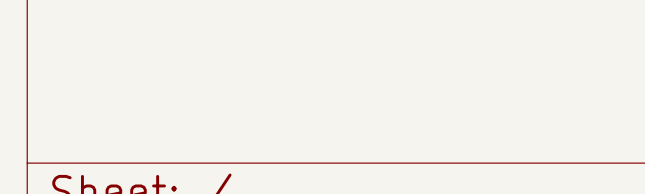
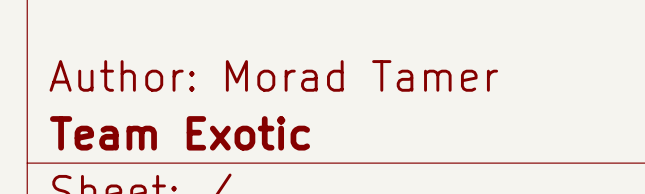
title block: none -> Author: Morad Tamer (273, 75)
title block: none -> Team Exotic (180, 133)

